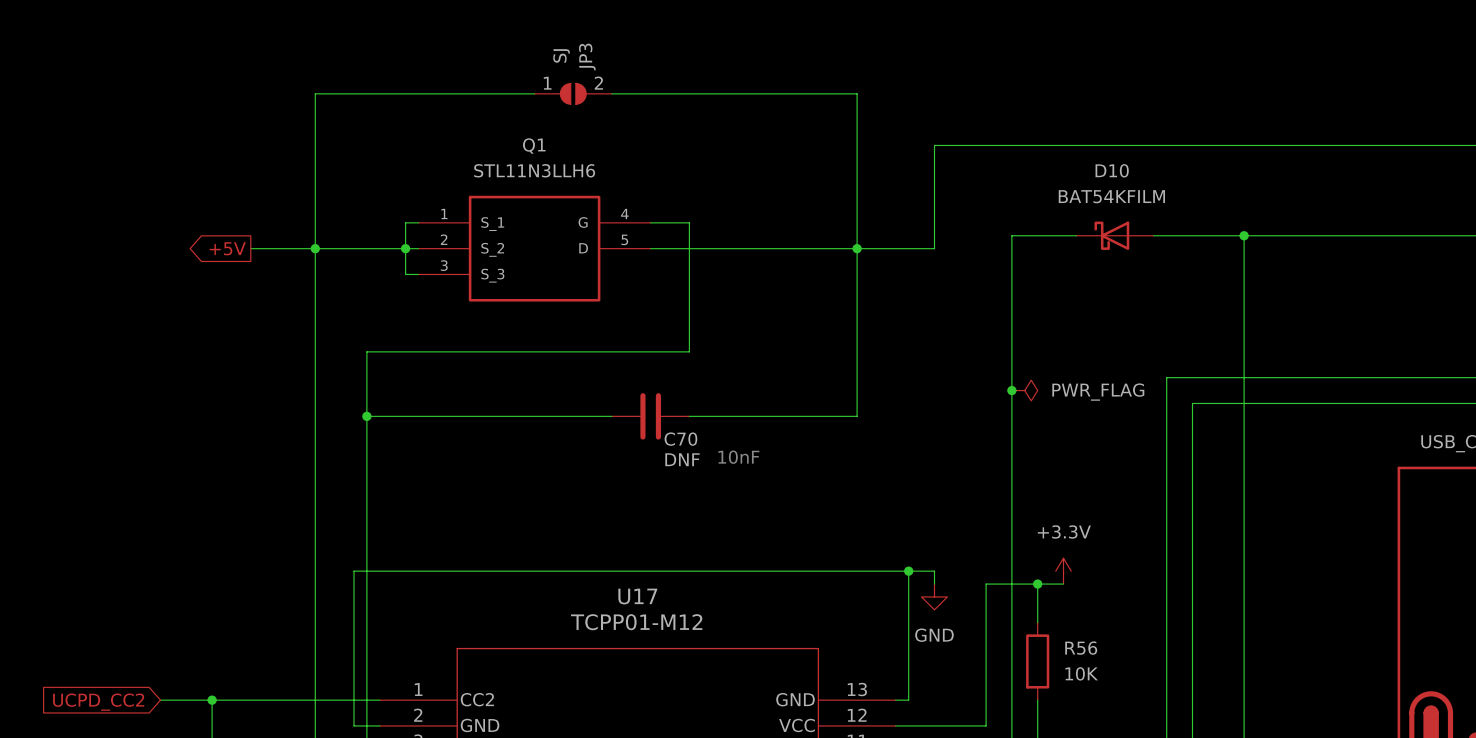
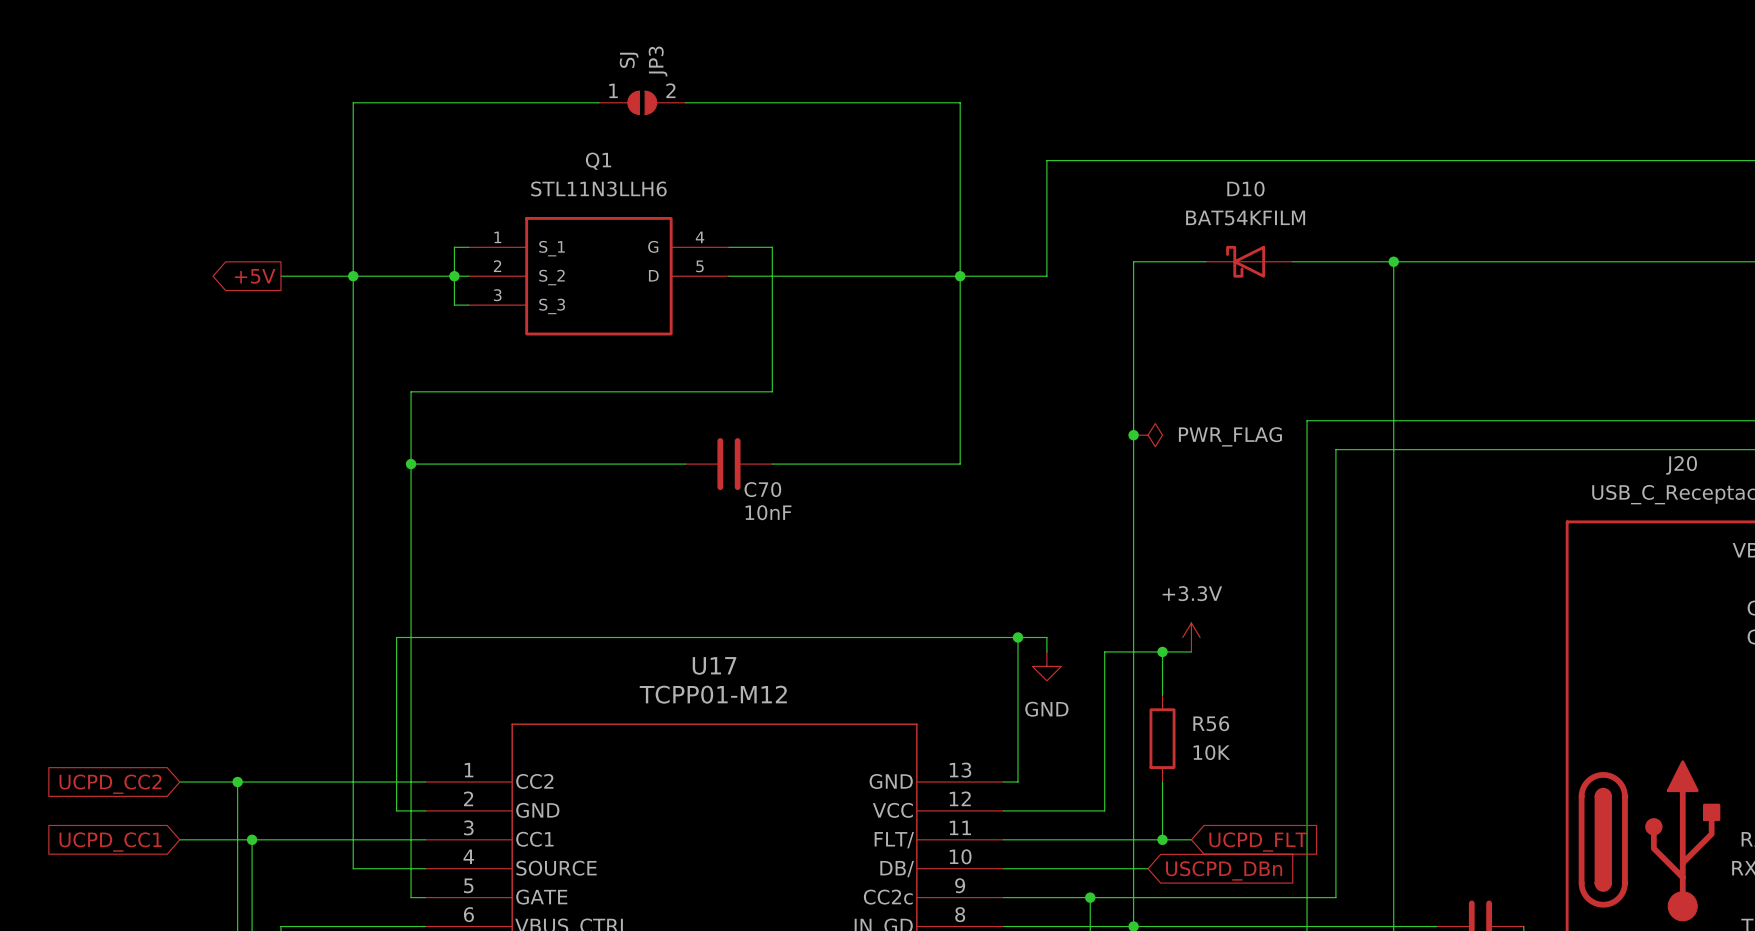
text: 10nF (738, 457) -> none
C70 value: DNF (682, 459) -> 10nF (768, 512)

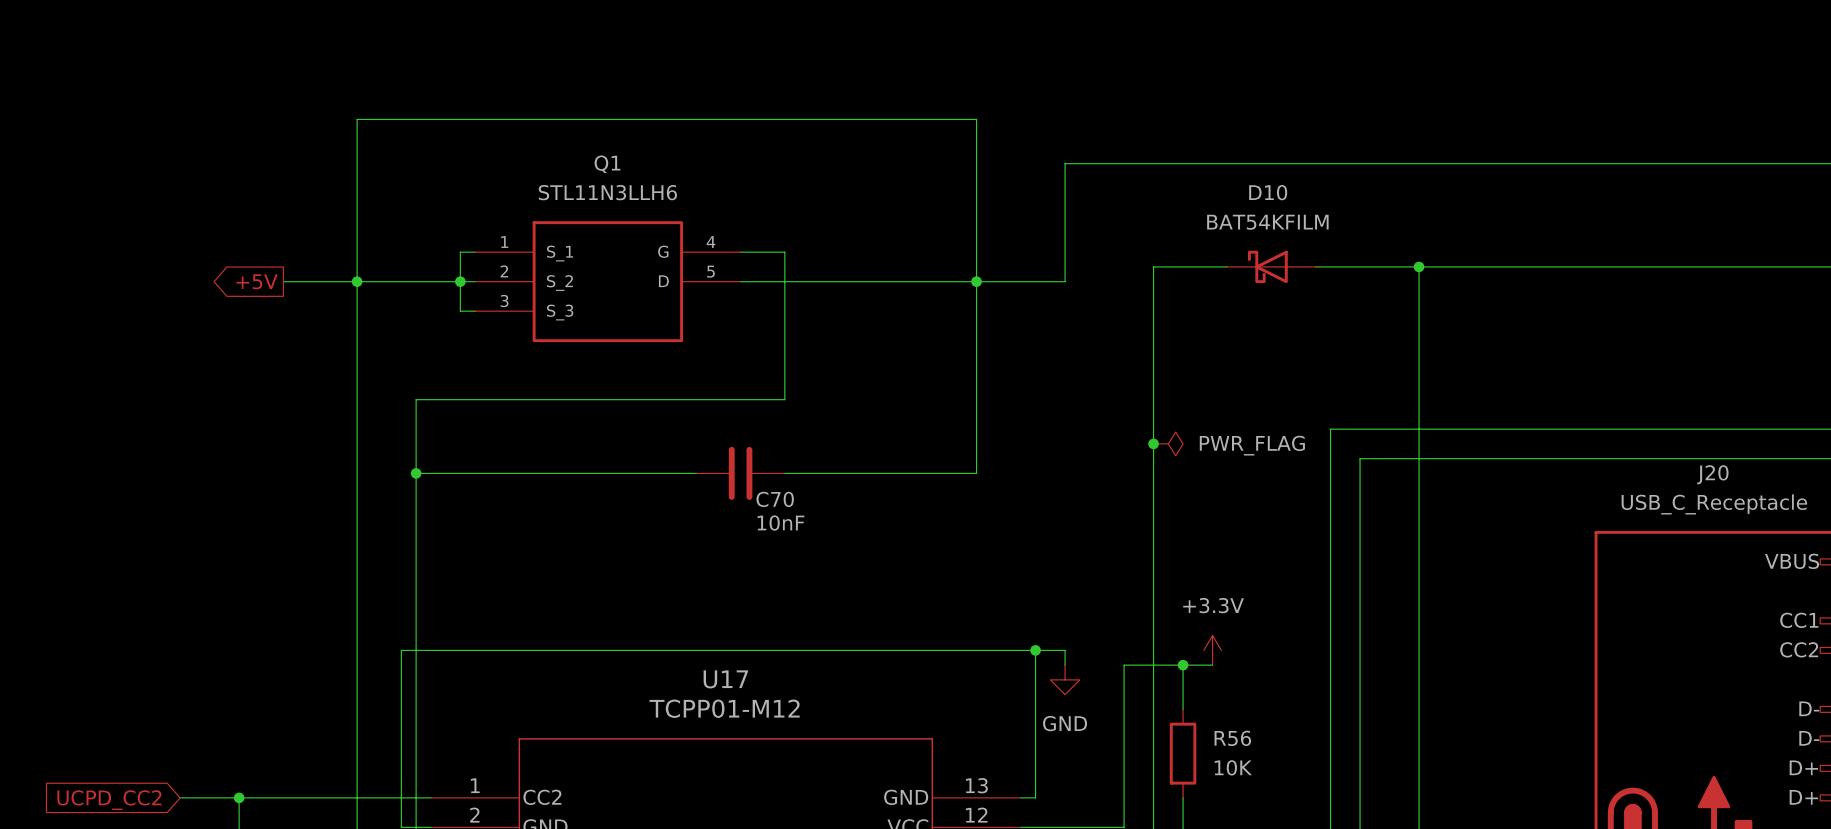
wire: (598, 102) (353, 102) (353, 117) -> none
JP3: SJ (642, 102) -> none
wire: (685, 102) (960, 102) (960, 117) -> (357, 119) (976, 119)

